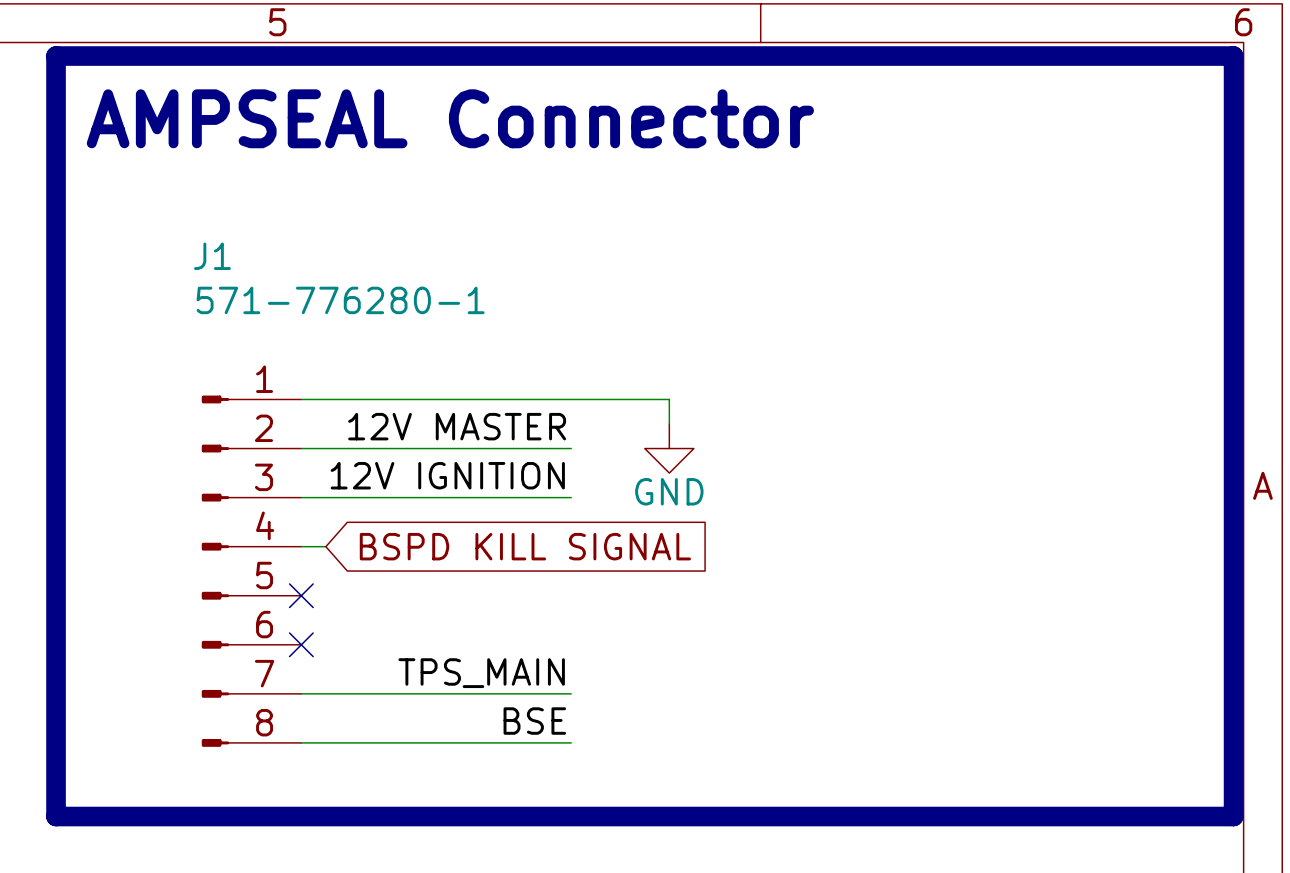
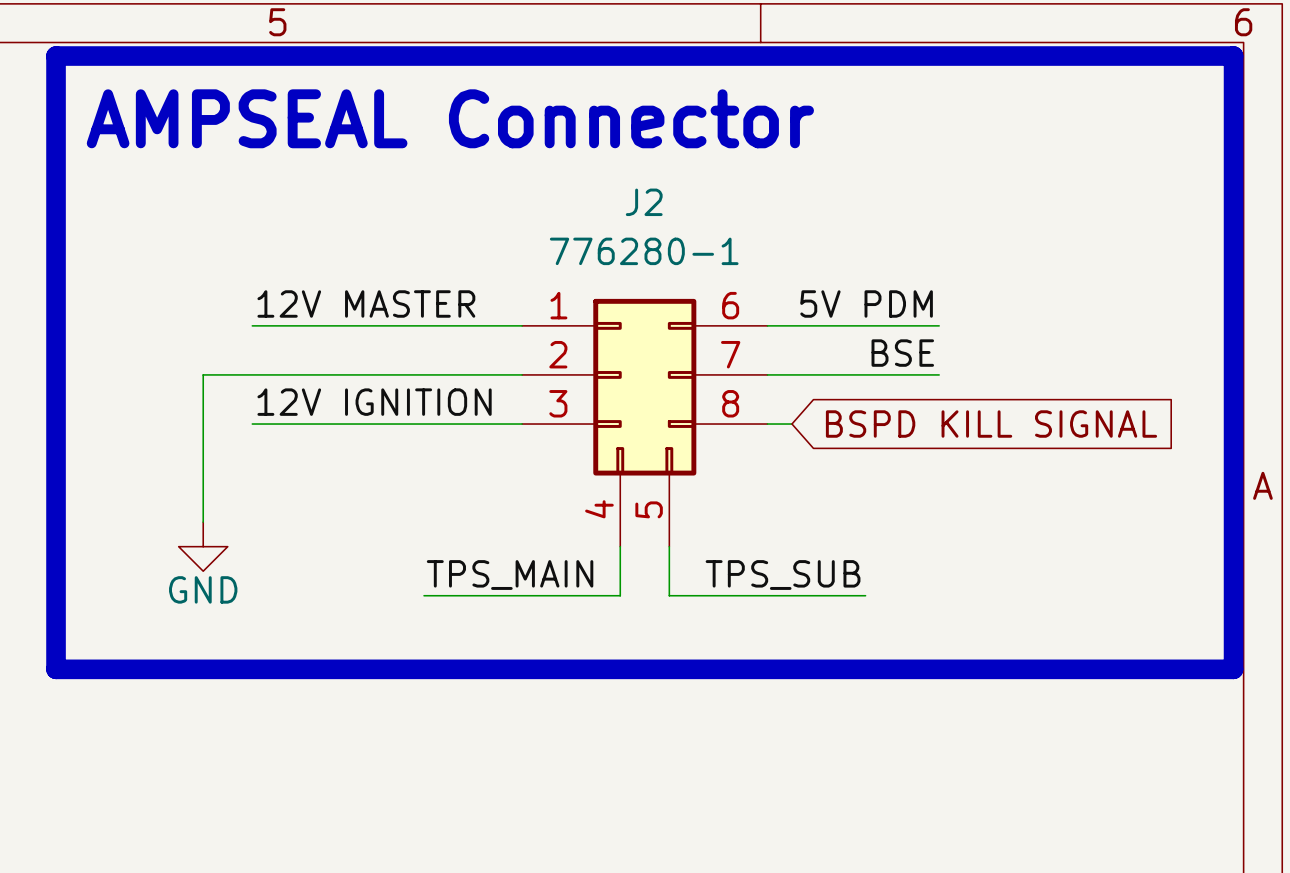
label: none -> 5V PDM (866, 303)
wire: none -> (767, 325) (939, 325)
label: none -> BSE (902, 353)
wire: none -> (522, 374) (203, 374) (203, 522)
wire: none -> (767, 374) (939, 374)
wire: (301, 399) (669, 399) (669, 424) -> none
J2: none -> 776280-1 (644, 422)
label position: 12V MASTER (457, 426) -> 12V MASTER (366, 303)
wire: (301, 448) (571, 448) -> (252, 424) (522, 424)
power symbol position: GND (669, 448) -> GND (203, 546)
label position: 12V IGNITION (447, 475) -> 12V IGNITION (374, 402)
wire: (301, 497) (571, 497) -> (252, 325) (522, 325)
wire: (301, 546) (325, 546) -> (767, 424) (791, 424)
global label position: BSPD KILL SIGNAL (525, 546) -> BSPD KILL SIGNAL (991, 424)
wire: none -> (620, 546) (620, 595) (424, 595)
wire: none -> (669, 546) (669, 595) (865, 595)
J1: 571-776280-1 (251, 571) -> none
label: none -> TPS_SUB (783, 575)
no-connect mark: (301, 595) -> none
no-connect mark: (301, 644) -> none
line: (56, 669) (56, 816) (1233, 816) (1233, 669) -> (56, 669) (1233, 669)
label position: TPS_MAIN (481, 673) -> TPS_MAIN (510, 575)
wire: (301, 693) (571, 693) -> none
label: BSE (534, 721) -> none
wire: (301, 742) (571, 742) -> none

